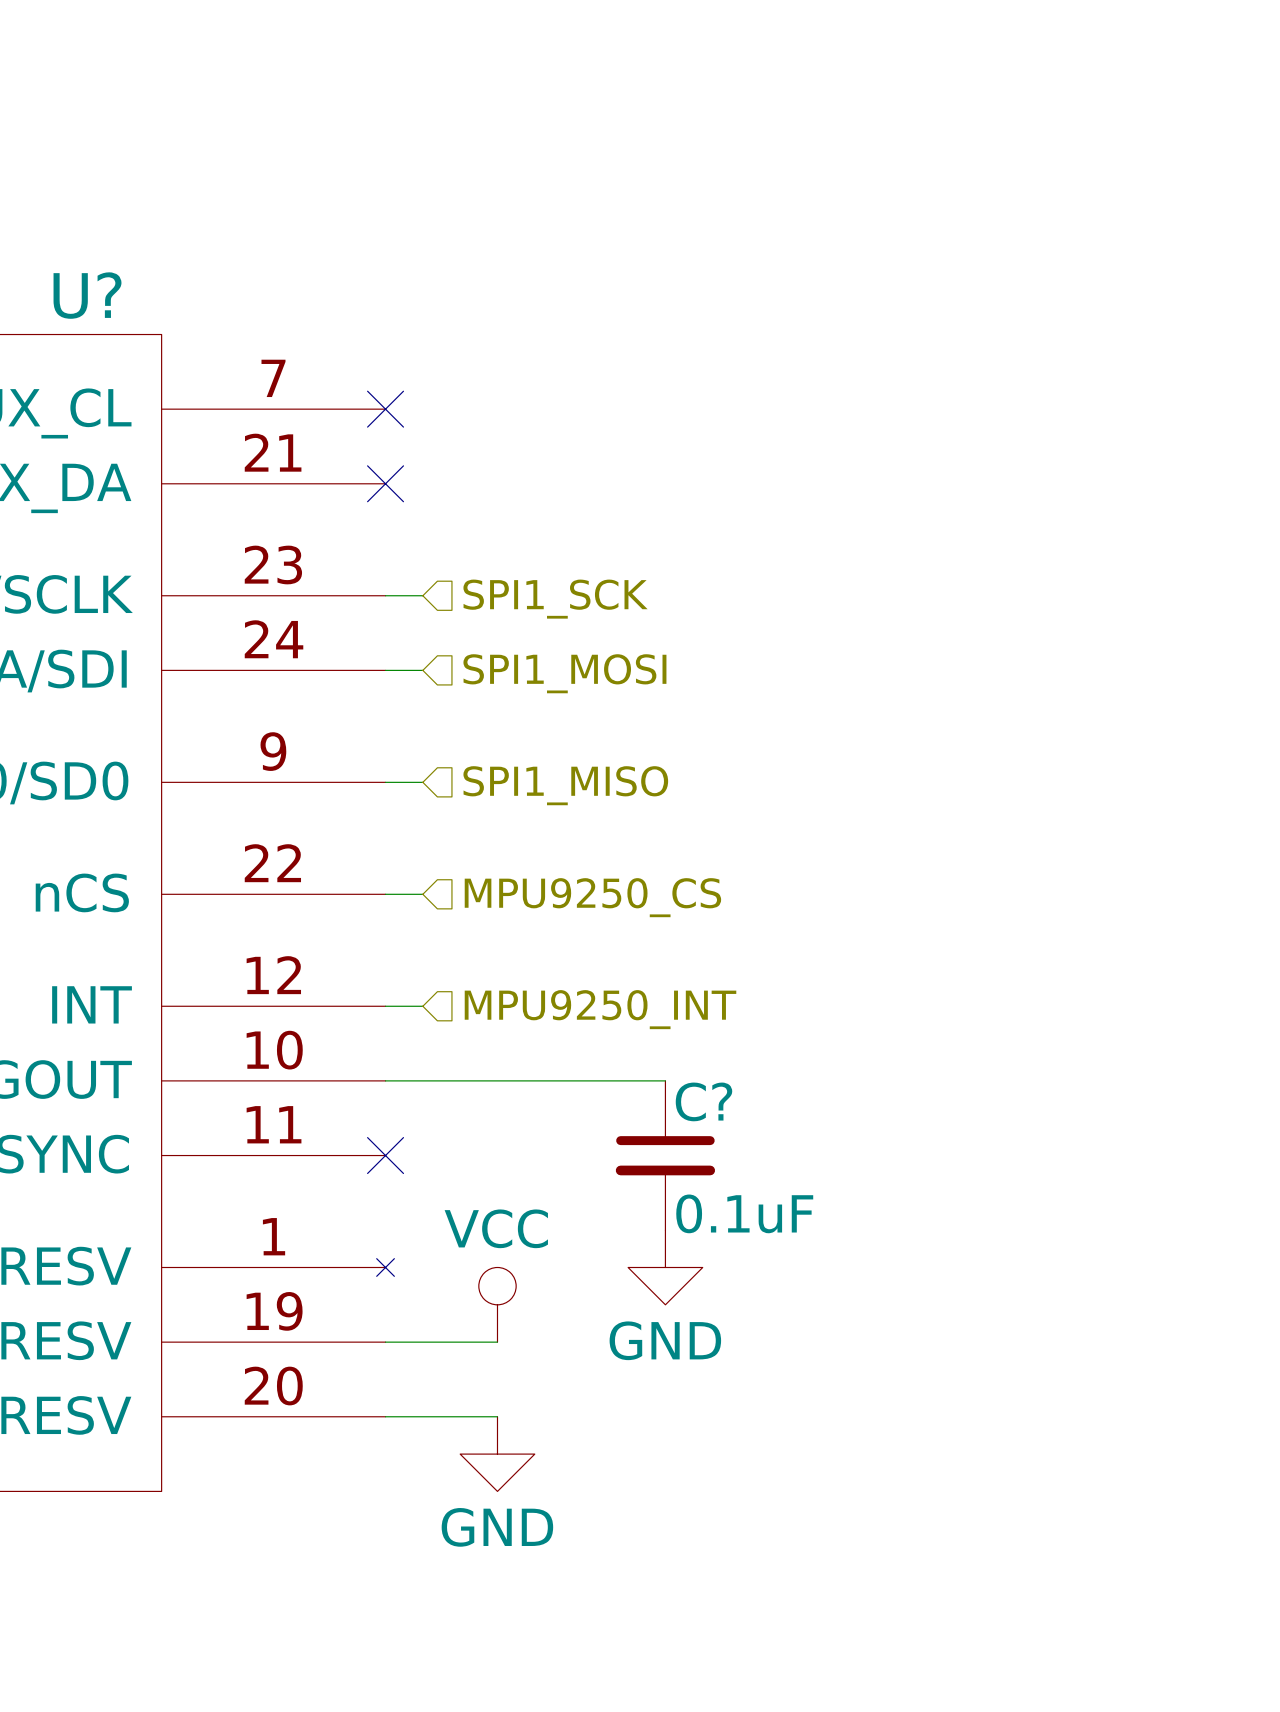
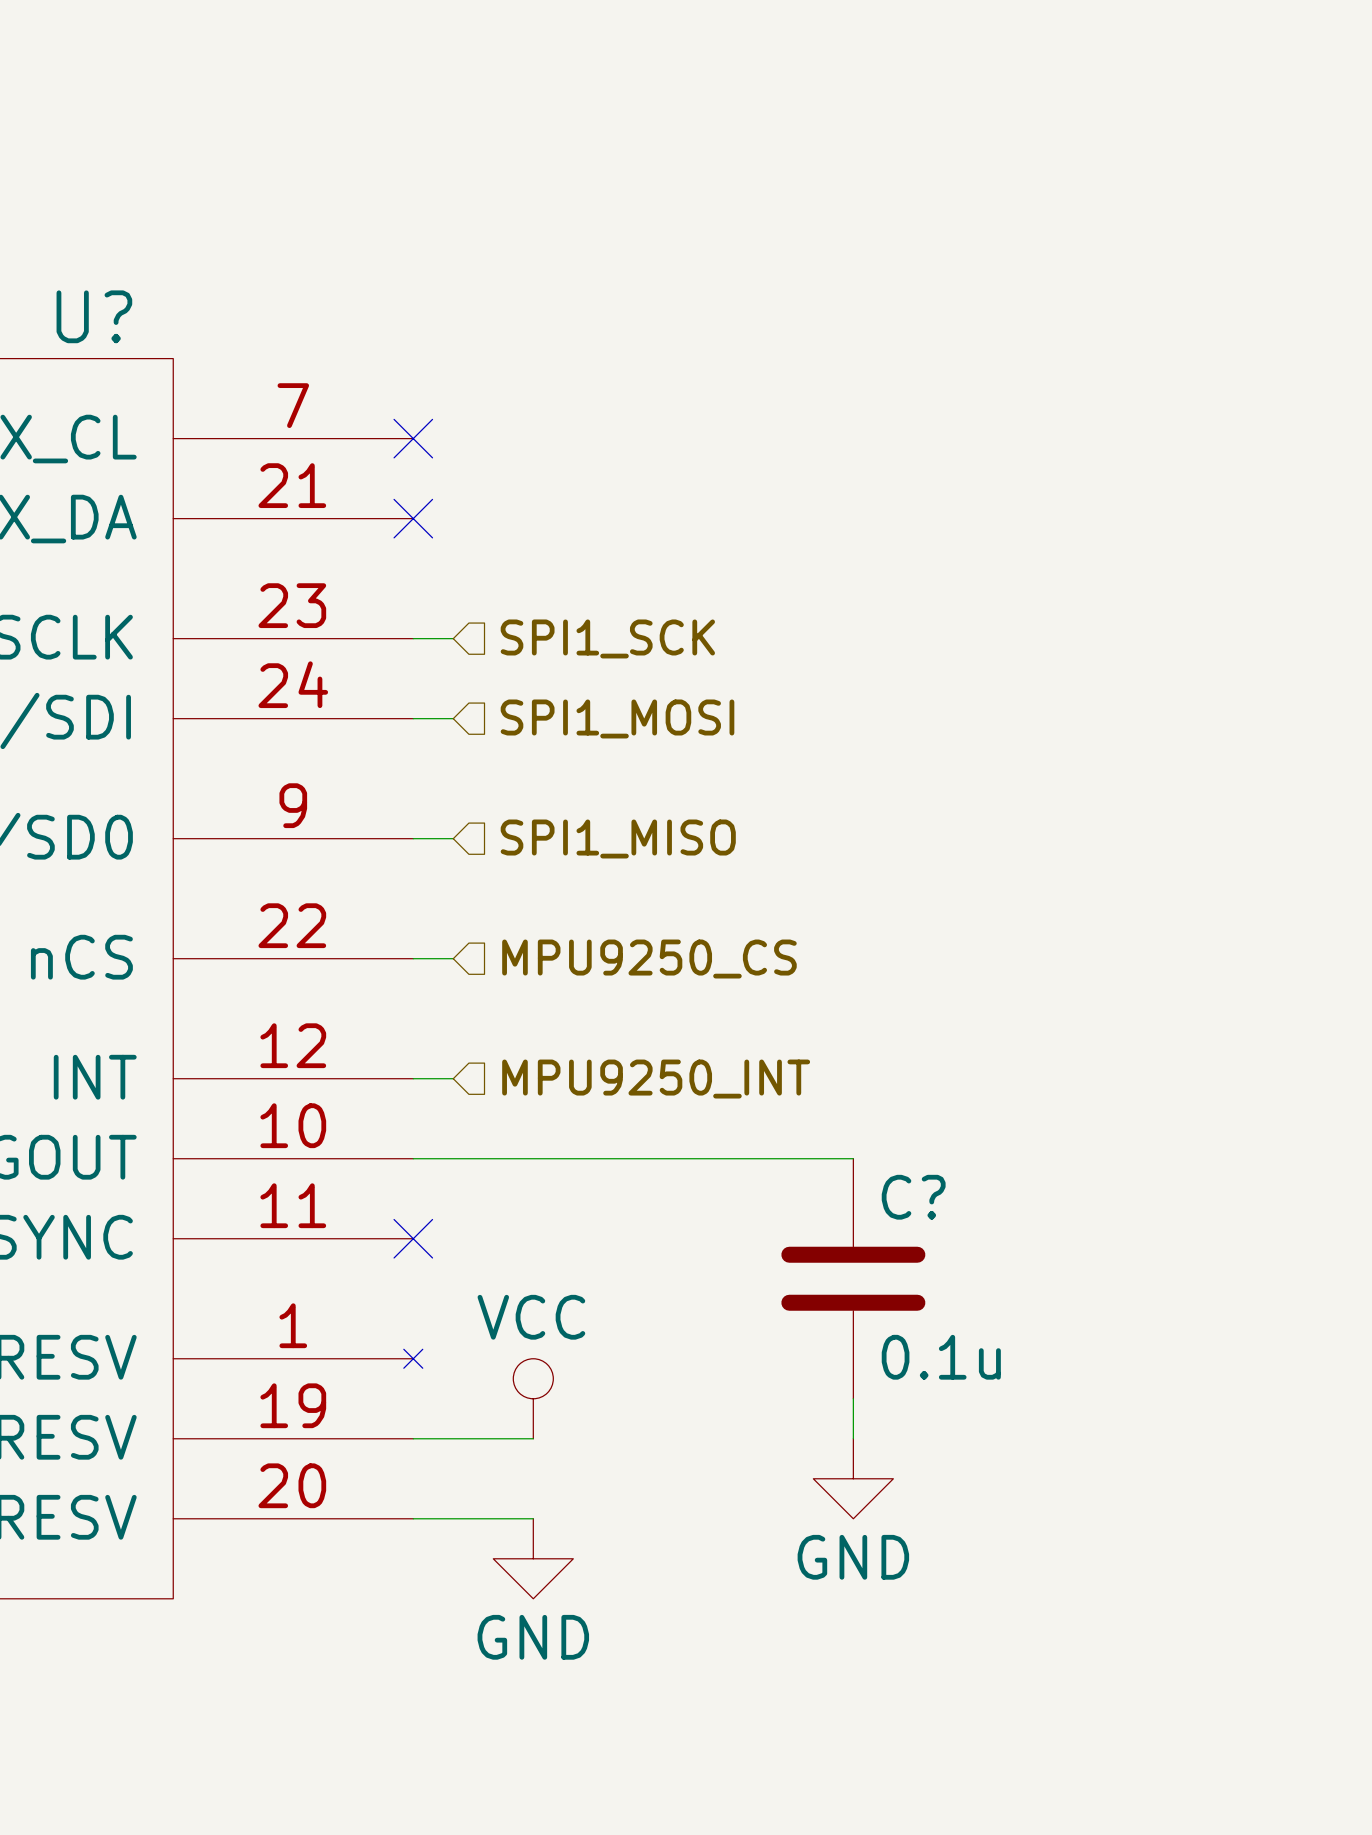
wire: none -> (713, 1158) (853, 1158)
C?: 0.1uF (665, 1155) -> none
C?: none -> 0.1u (853, 1278)
power symbol position: GND (665, 1267) -> GND (853, 1478)
wire: none -> (853, 1398) (853, 1438)

